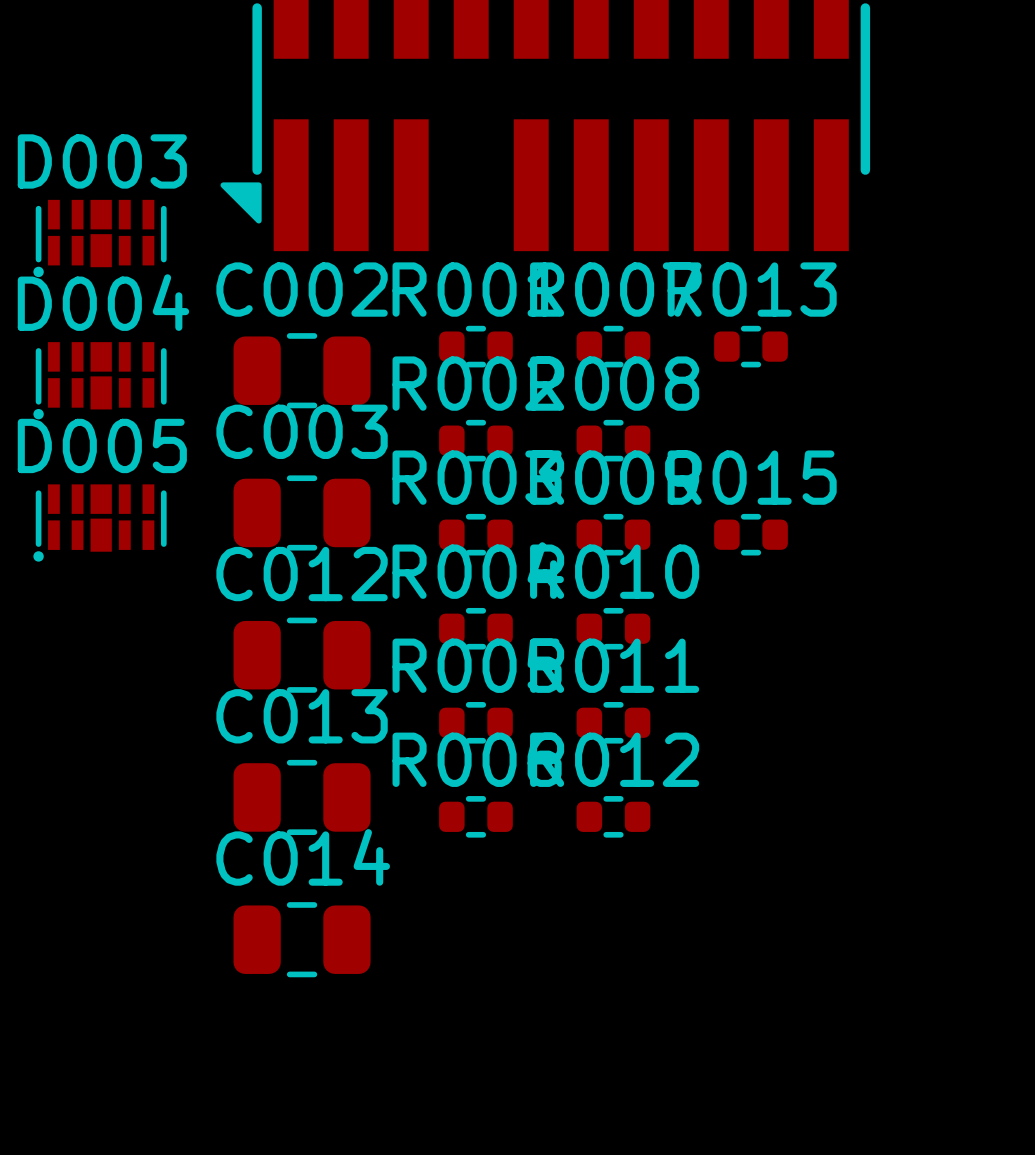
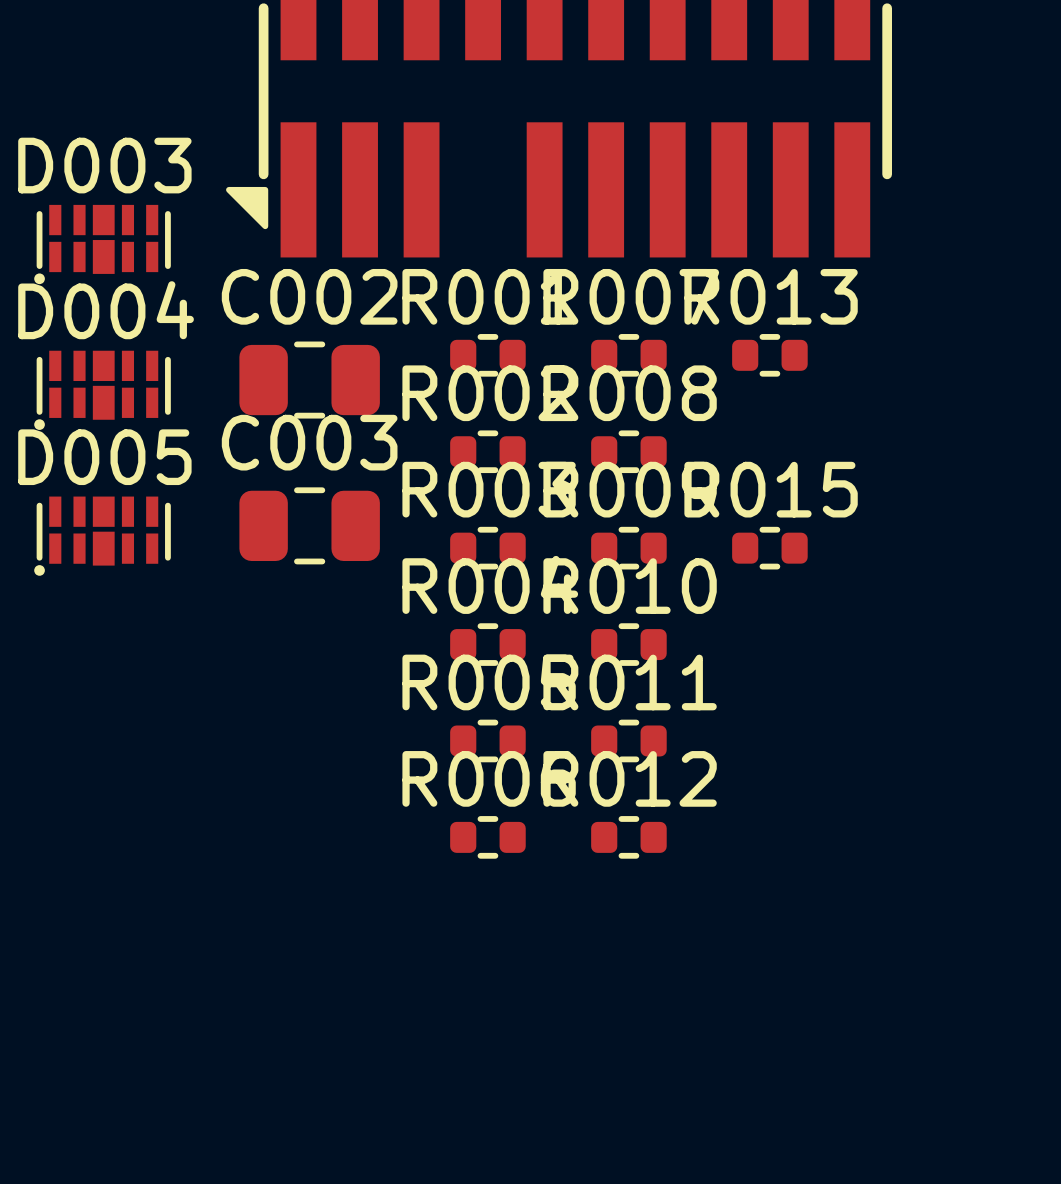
C012: (302, 655) -> none
C013: (302, 797) -> none
C014: (302, 939) -> none

